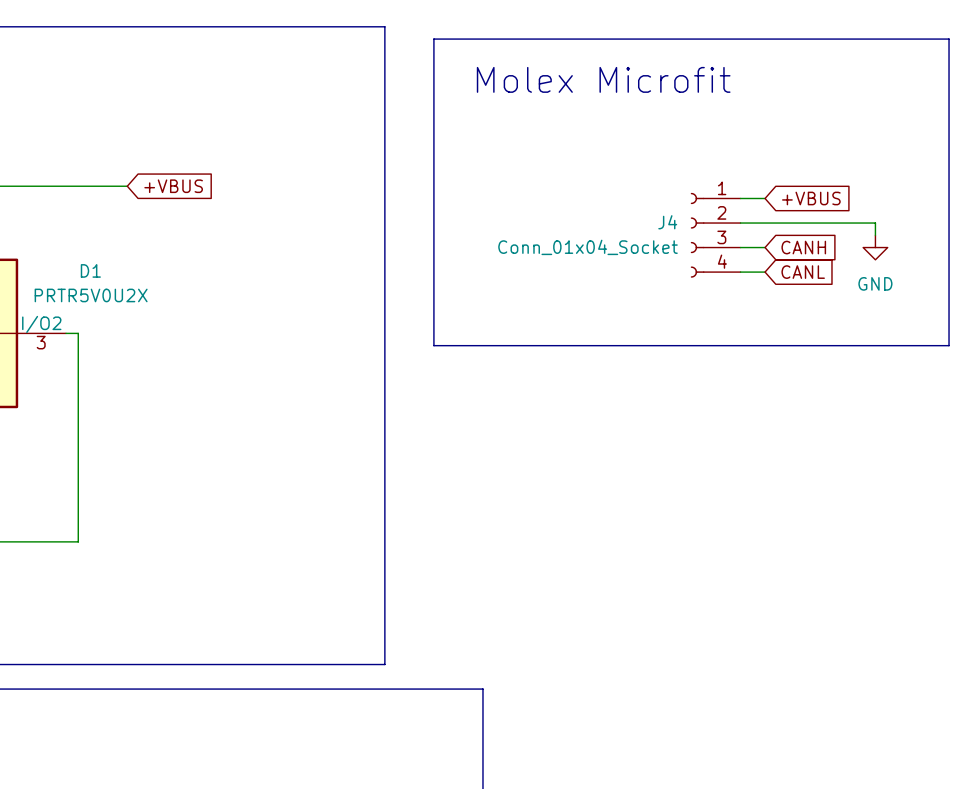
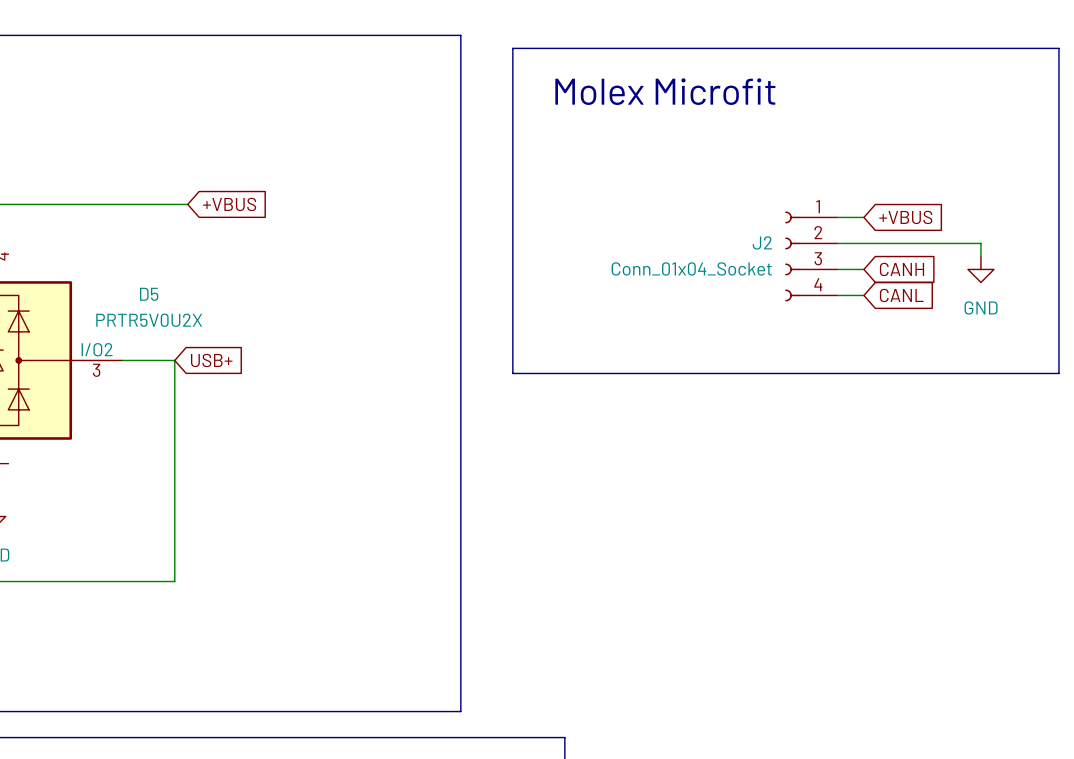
J4 name: J4 (667, 222) -> J2 (762, 242)
D1 name: D1 (90, 270) -> D5 (149, 294)
wire: (78, 333) (78, 541) -> (135, 360) (174, 360) (174, 581) (135, 581)
global label: none -> USB+ (211, 360)

